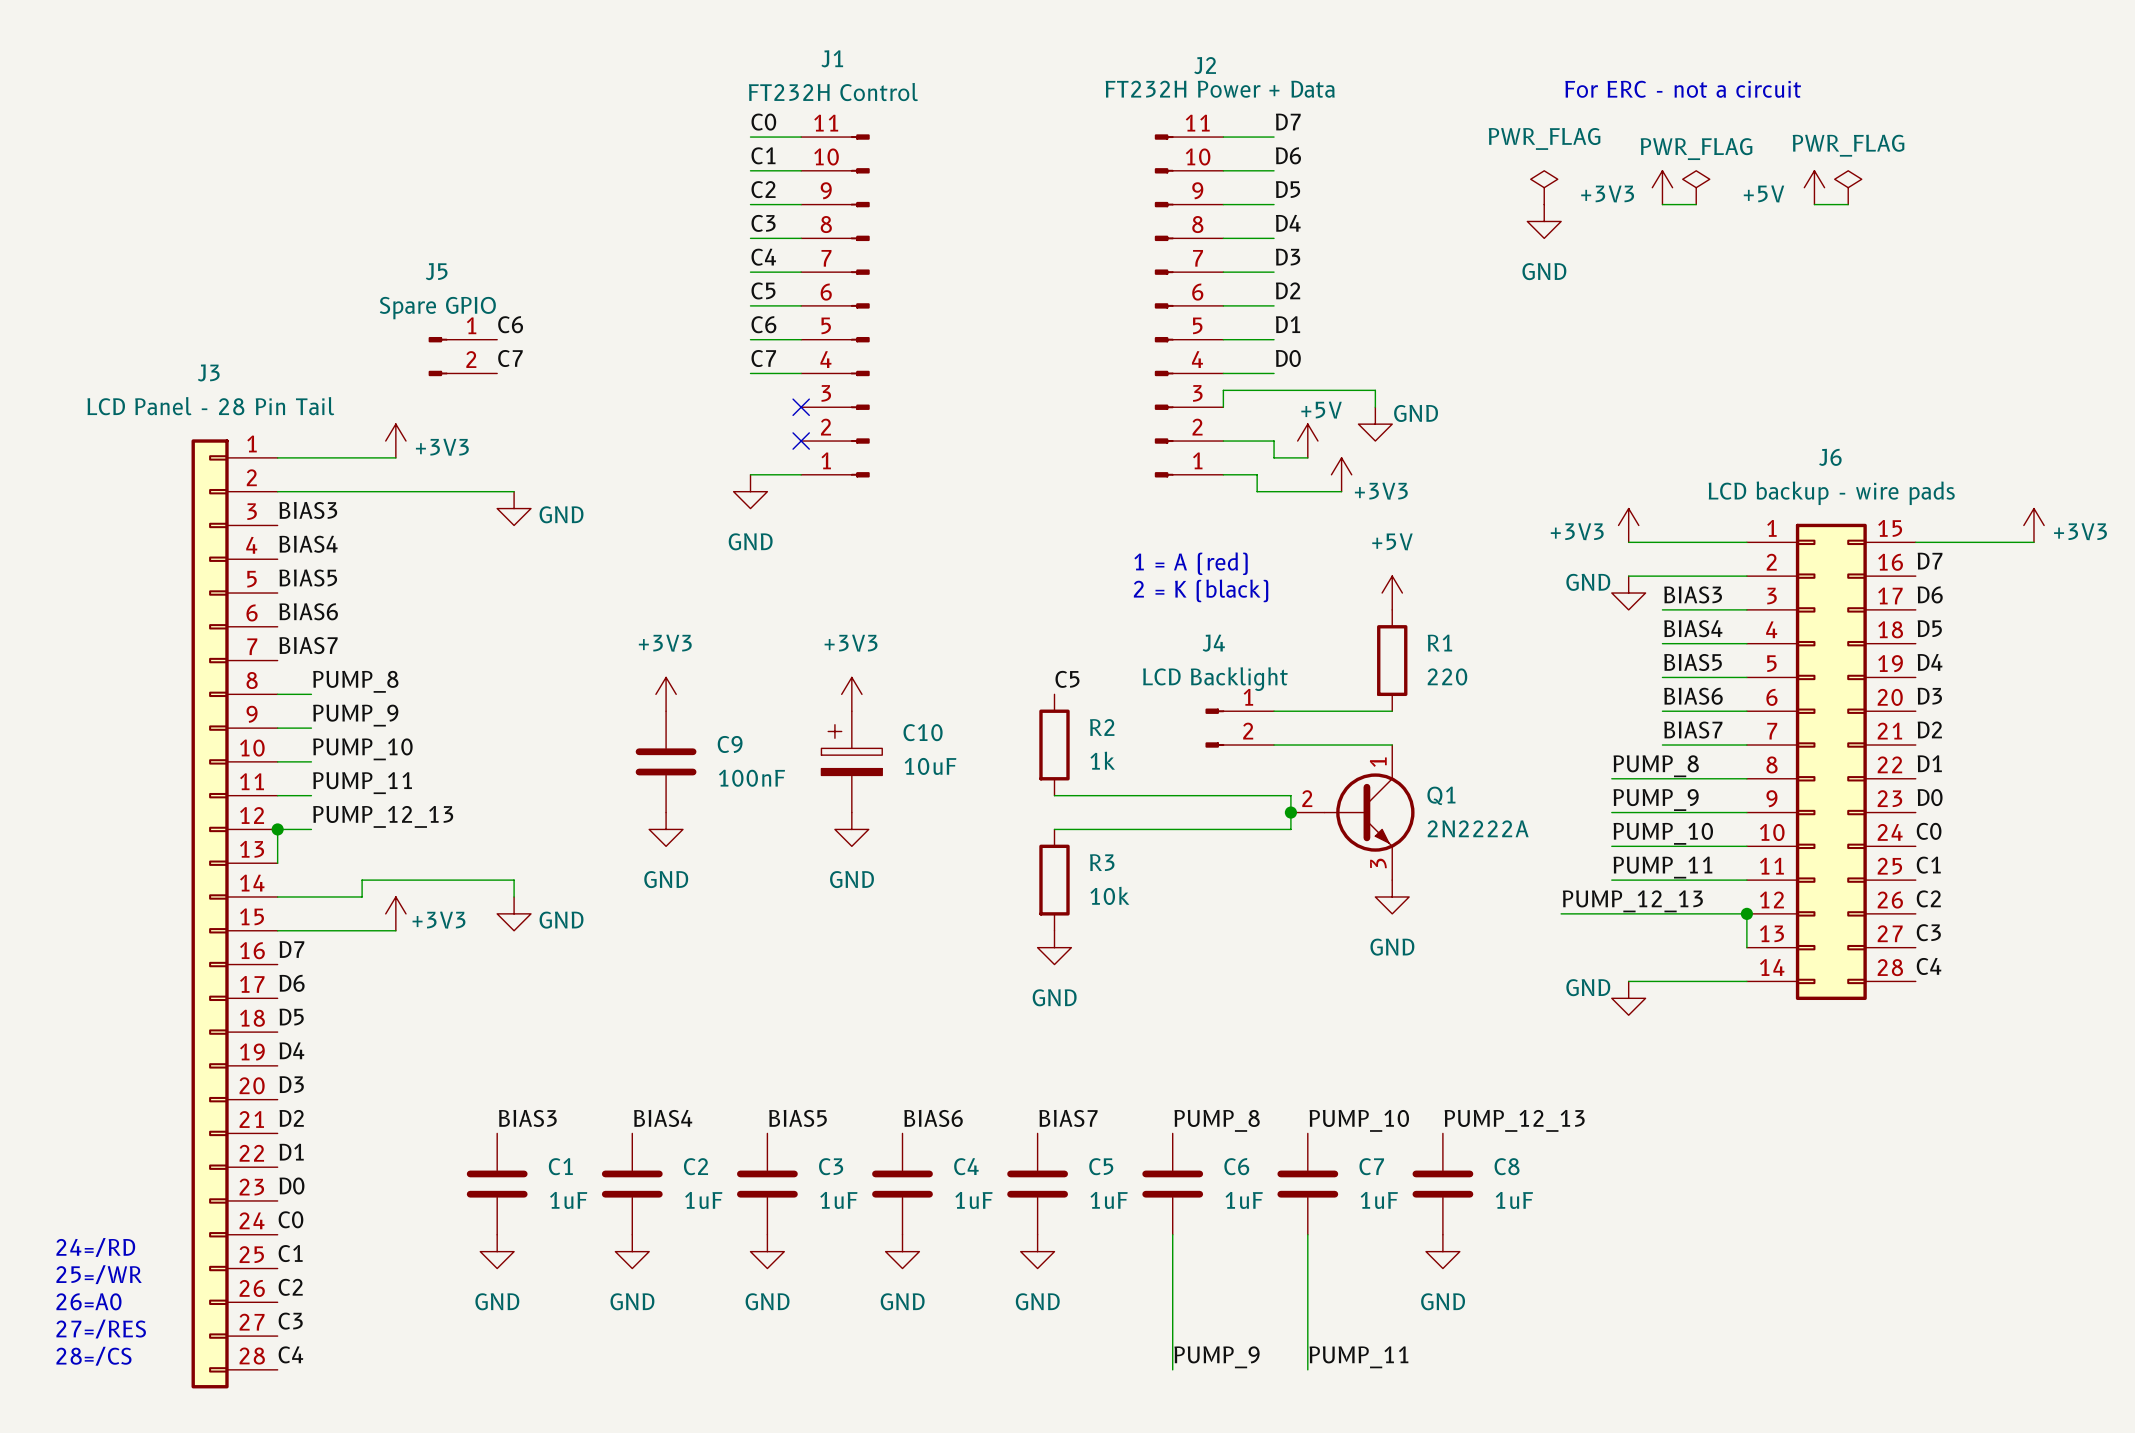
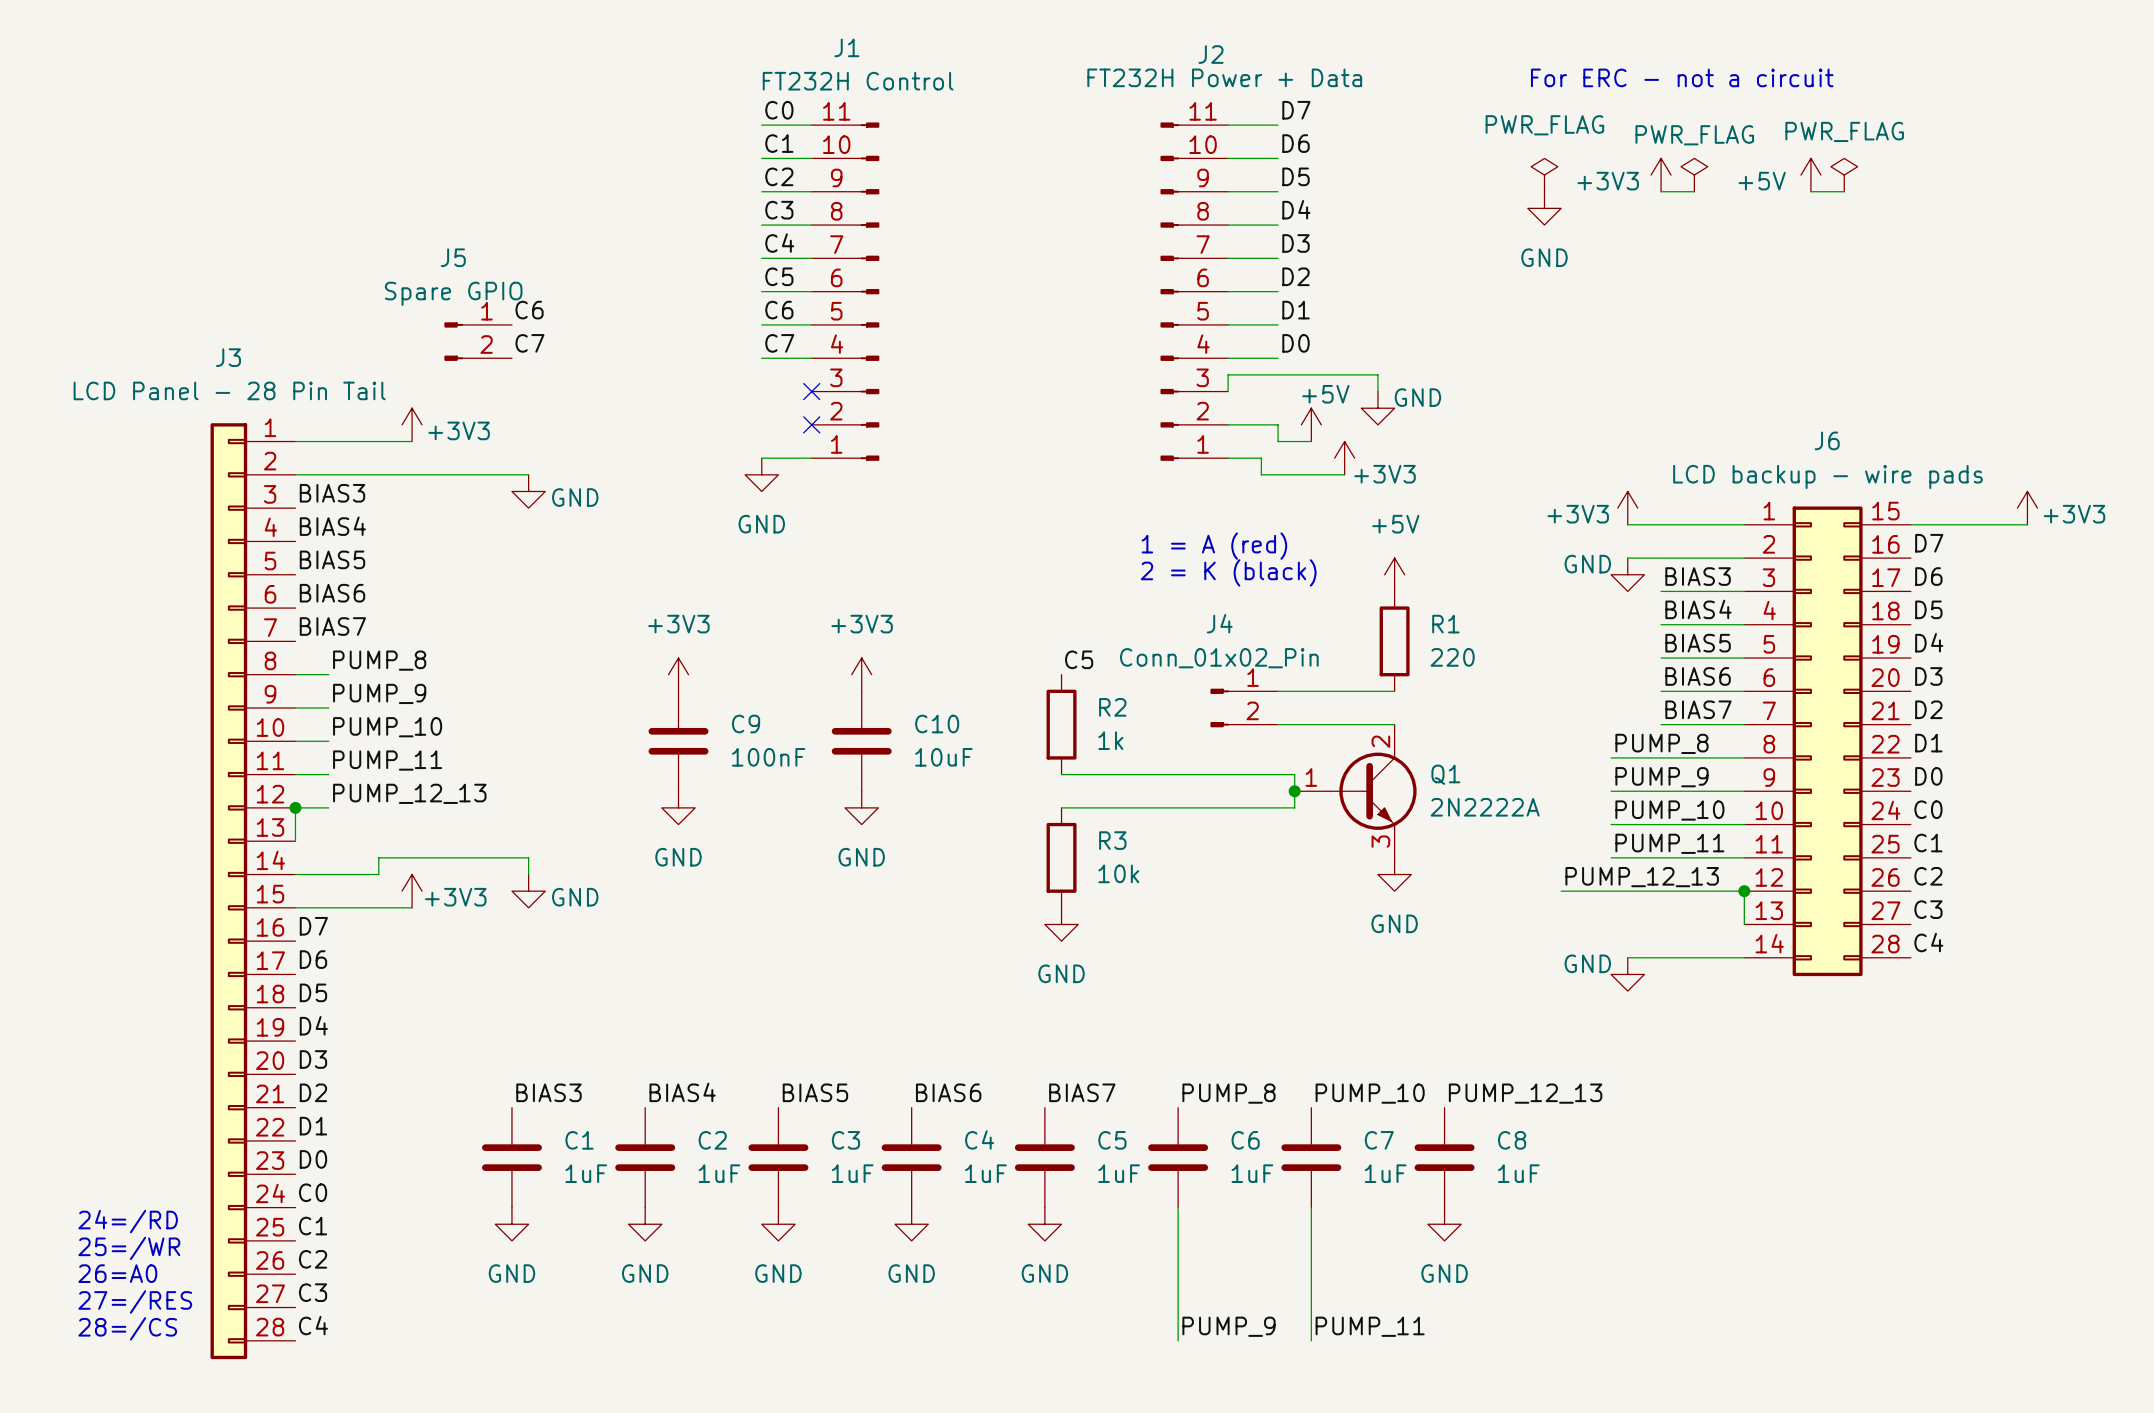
J4 value: LCD Backlight (1215, 679) -> Conn_01x02_Pin (1219, 658)
C10 symbol: [821, 711, 883, 813] -> [831, 691, 892, 792]
Q1 pin number: 1 (1378, 762) -> 2 (1380, 741)
Q1 pin number: 2 (1307, 798) -> 1 (1311, 777)

